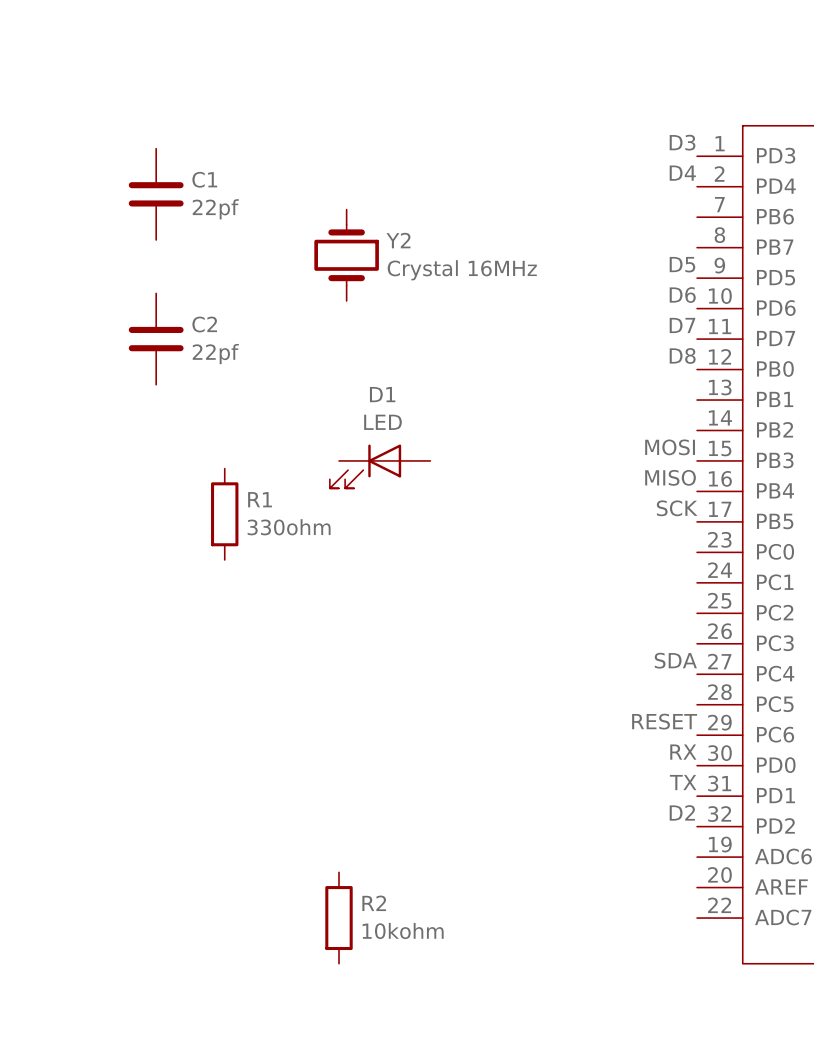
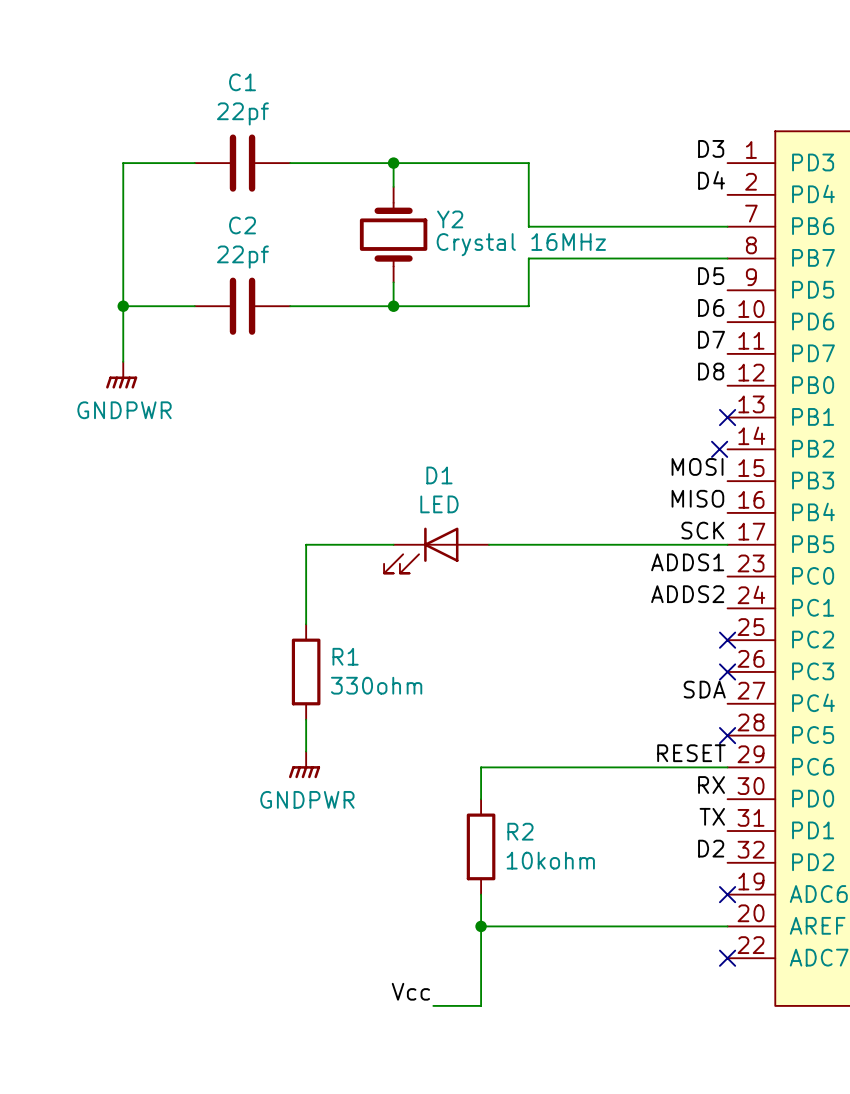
wire: none -> (194, 163) (123, 163) (123, 361)
wire: none -> (290, 163) (528, 163) (528, 226) (727, 226)
wire: none -> (393, 163) (393, 186)
junction: none -> (393, 163)
C1 name position: C1 (204, 179) -> C1 (242, 82)
C1 rotation: 0° (156, 194) -> 90° clockwise (242, 163)
C1 position: (156, 194) -> (242, 163)
C1 value position: 22pf (215, 209) -> 22pf (242, 113)
wire: none -> (727, 258) (528, 258) (528, 306) (290, 306)
Y2 position: (346, 255) -> (393, 234)
wire: none -> (393, 282) (393, 306)
Y2 value position: Crystal 16MHz (462, 270) -> Crystal 16MHz (521, 244)
wire: none -> (123, 306) (194, 306)
junction: none -> (123, 306)
junction: none -> (393, 306)
C2 name position: C2 (204, 324) -> C2 (242, 225)
C2 rotation: 0° (156, 339) -> 90° clockwise (242, 306)
C2 position: (156, 339) -> (242, 306)
C2 value position: 22pf (215, 354) -> 22pf (242, 257)
power symbol: none -> GNDPWR (121, 375)
no-connect mark: none -> (727, 417)
no-connect mark: none -> (719, 449)
D1 position: (380, 466) -> (436, 550)
R1 position: (224, 514) -> (306, 671)
wire: none -> (393, 544) (306, 544) (306, 624)
wire: none -> (489, 544) (727, 544)
label: none -> ADDS1 (687, 562)
label: none -> ADDS2 (687, 594)
no-connect mark: none -> (727, 640)
no-connect mark: none -> (727, 671)
wire: none -> (306, 719) (306, 751)
no-connect mark: none -> (727, 735)
power symbol: none -> GNDPWR (304, 764)
wire: none -> (727, 767) (481, 767) (481, 799)
wire: none -> (481, 894) (481, 1005) (433, 1005)
no-connect mark: none -> (727, 894)
wire: none -> (481, 926) (727, 926)
junction: none -> (481, 926)
R2 position: (339, 918) -> (481, 846)
no-connect mark: none -> (727, 958)
label: none -> Vcc (410, 991)

